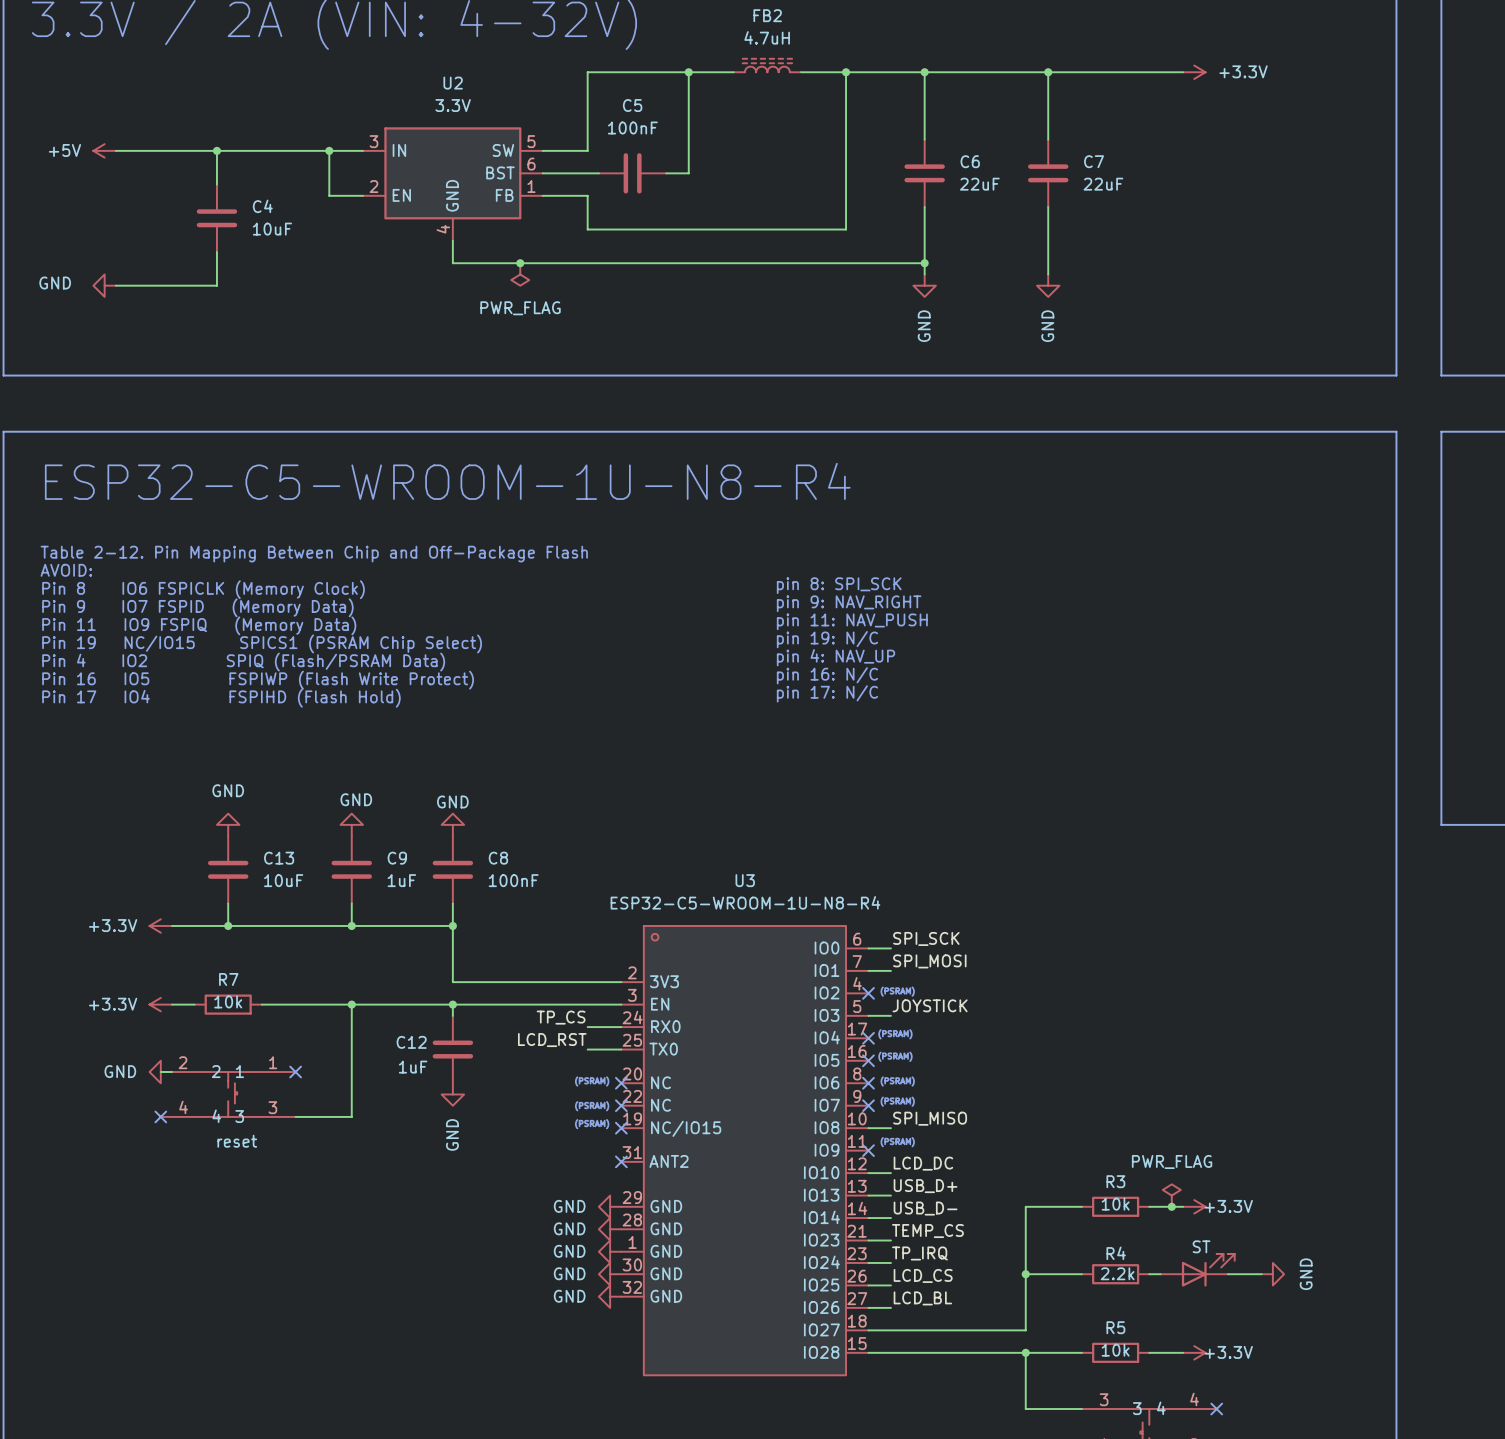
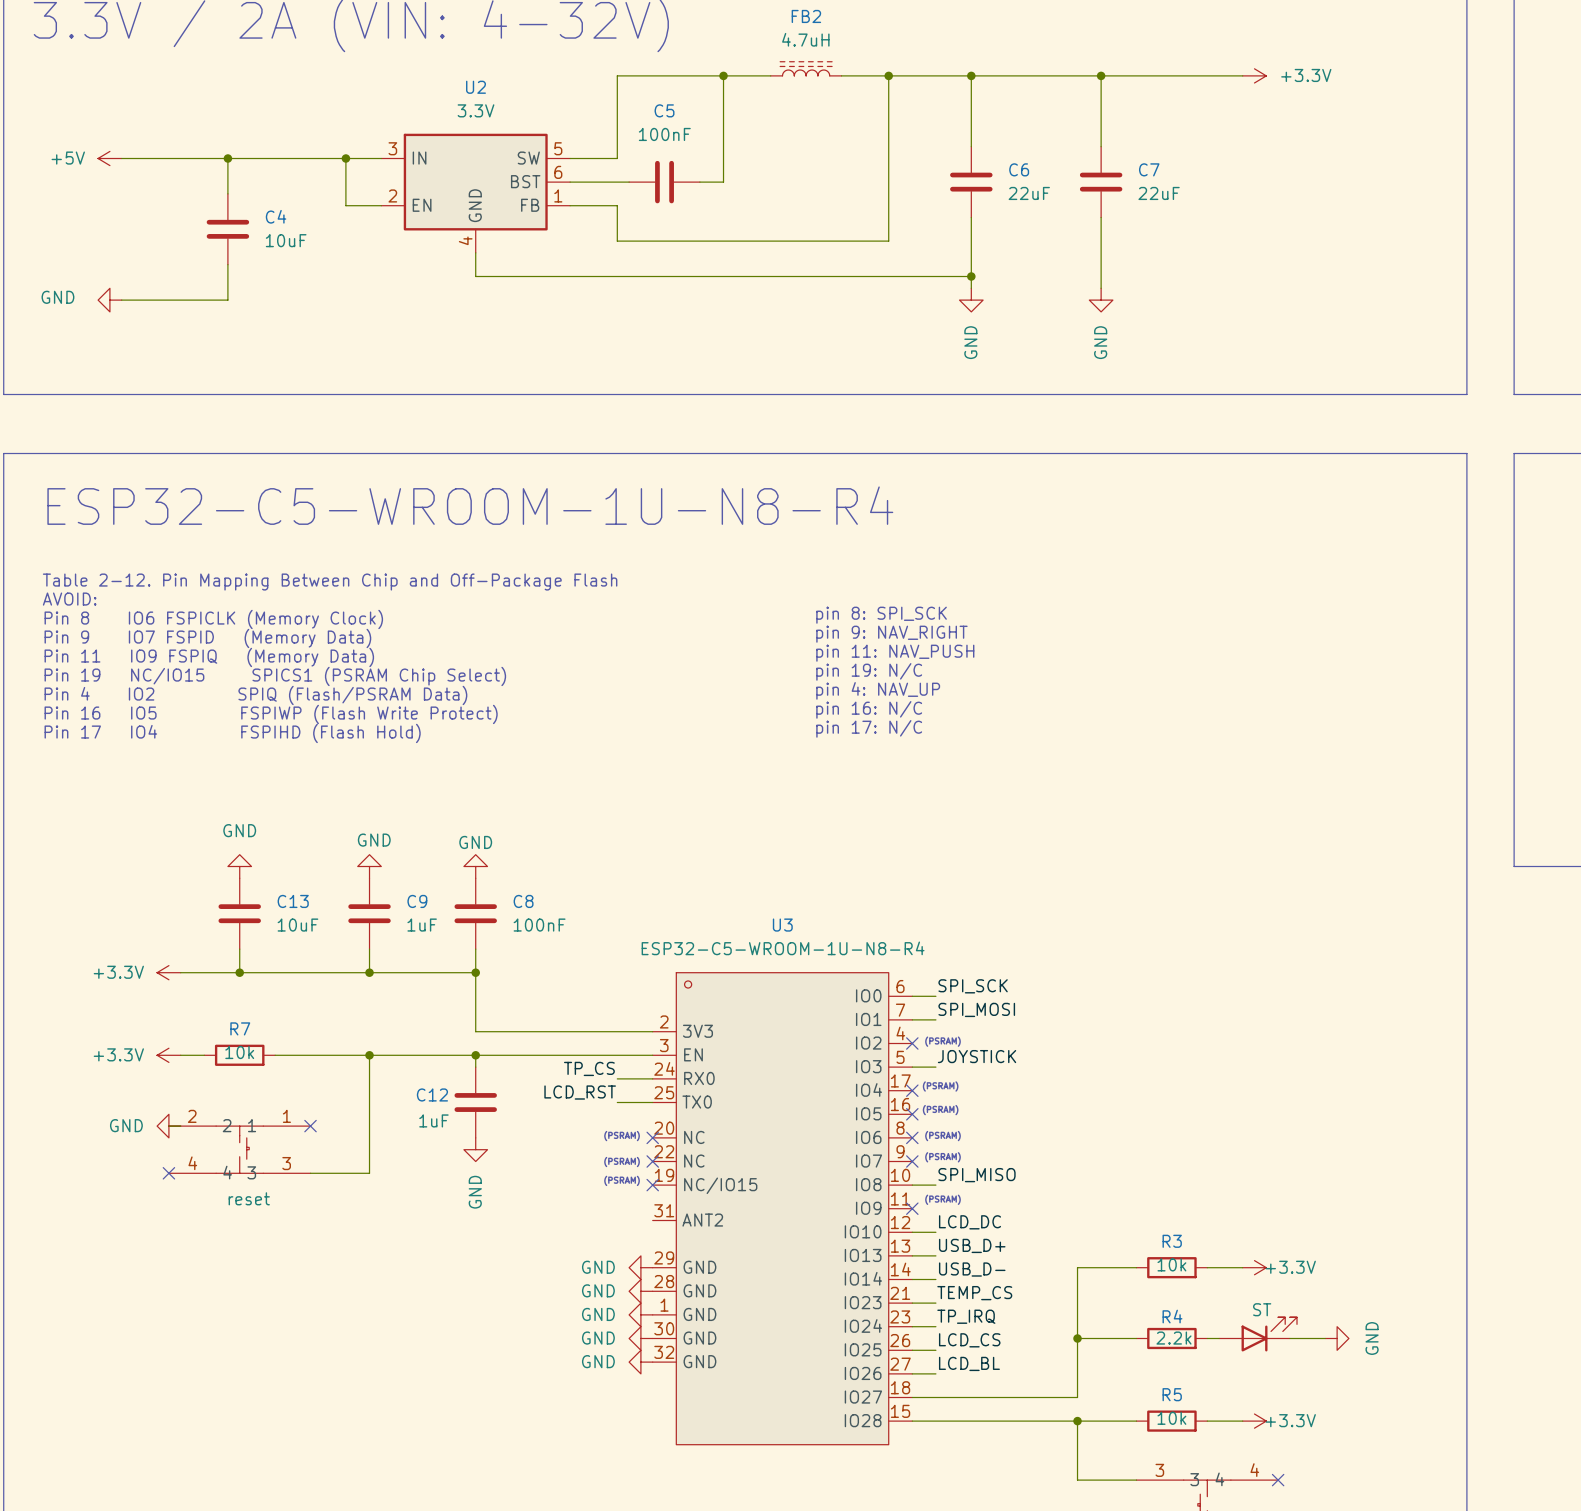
junction: (520, 263) -> none
power symbol: PWR_FLAG (520, 274) -> none
no-connect mark: (621, 1161) -> none
power symbol: PWR_FLAG (1171, 1195) -> none
junction: (1171, 1206) -> none

